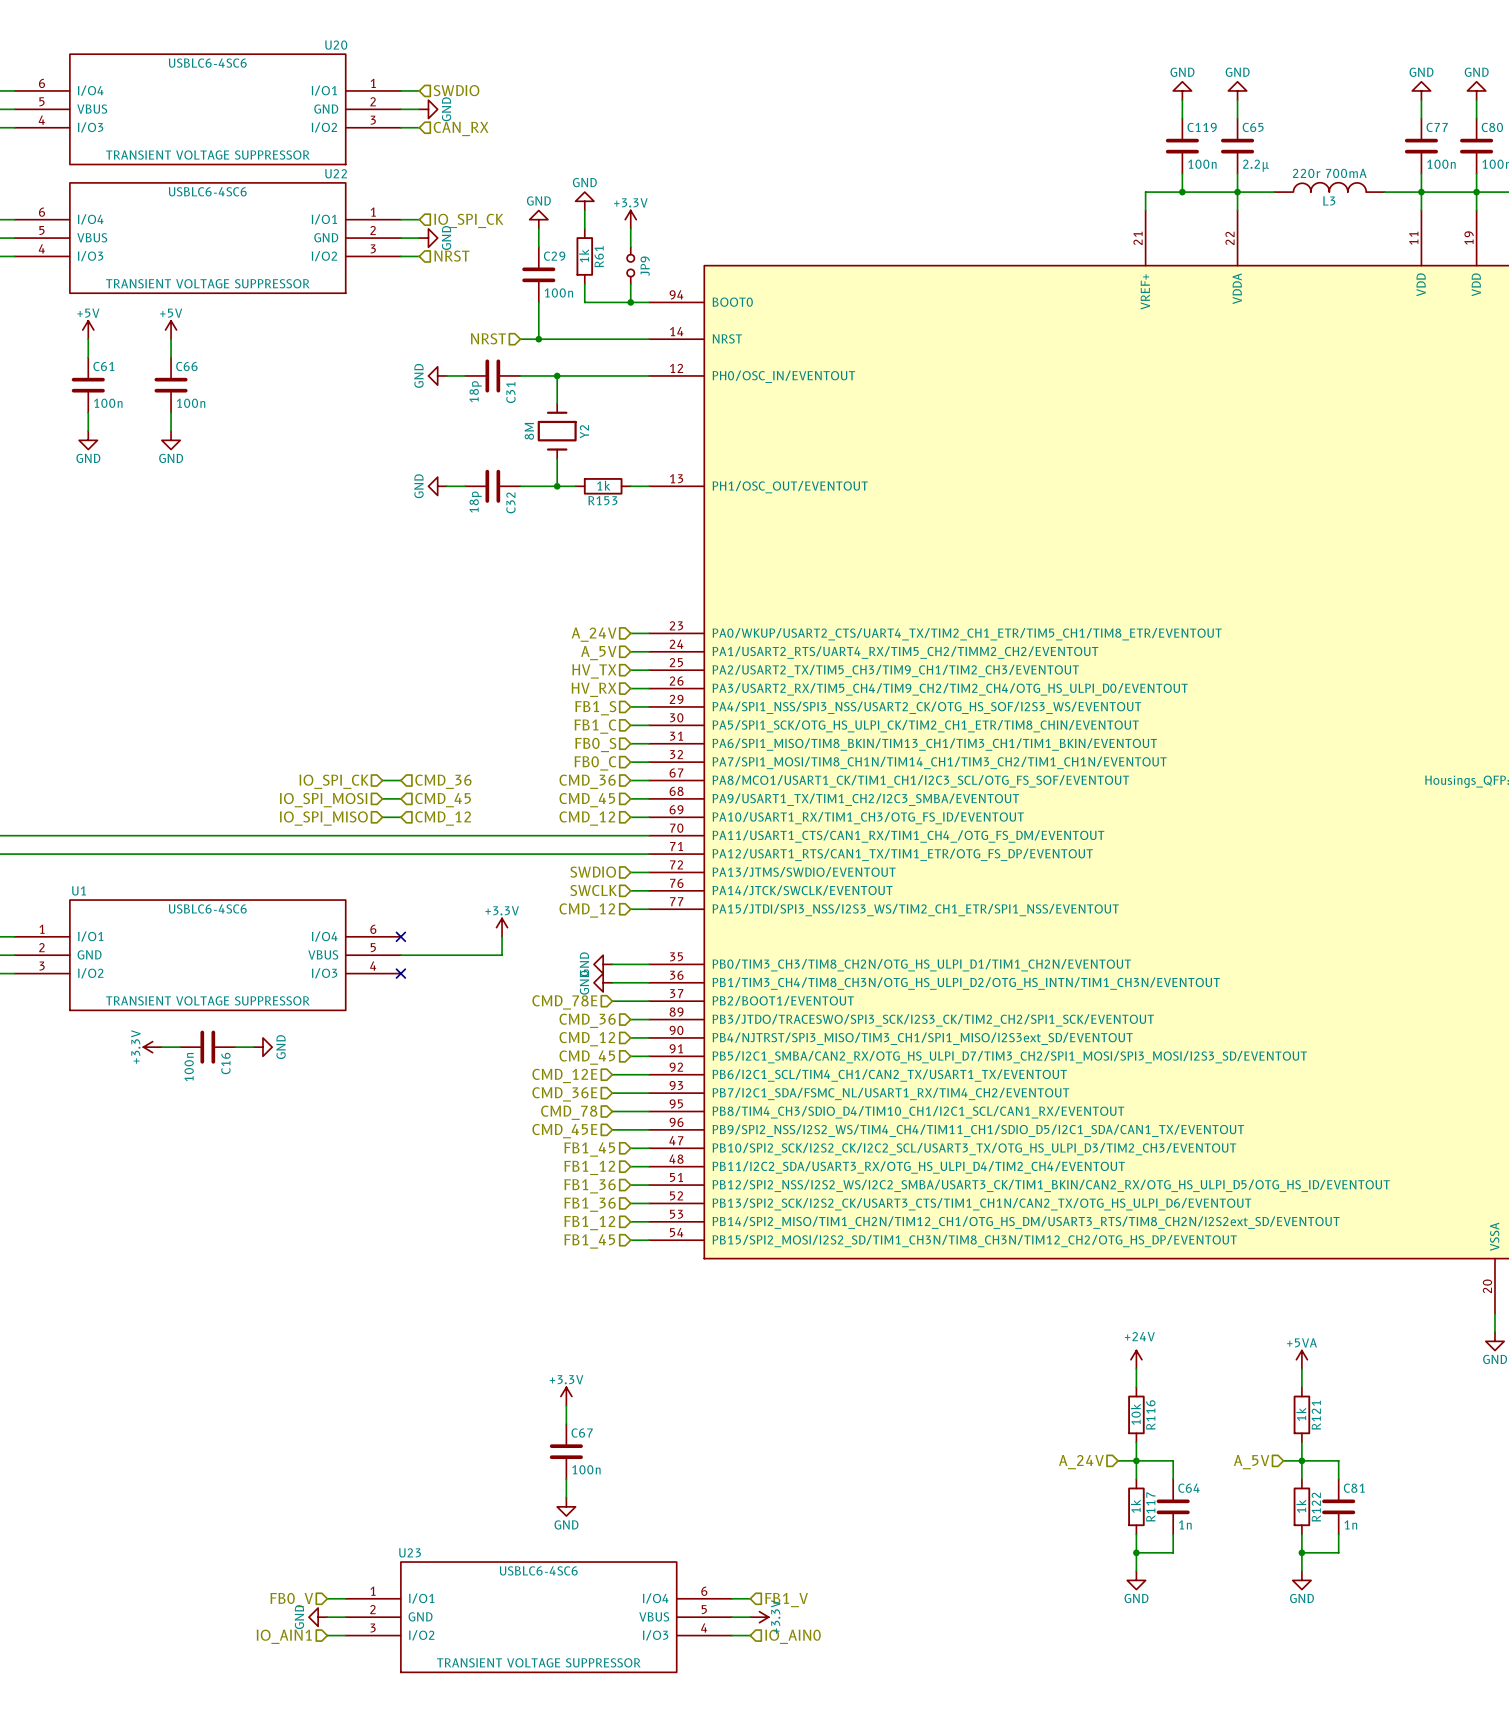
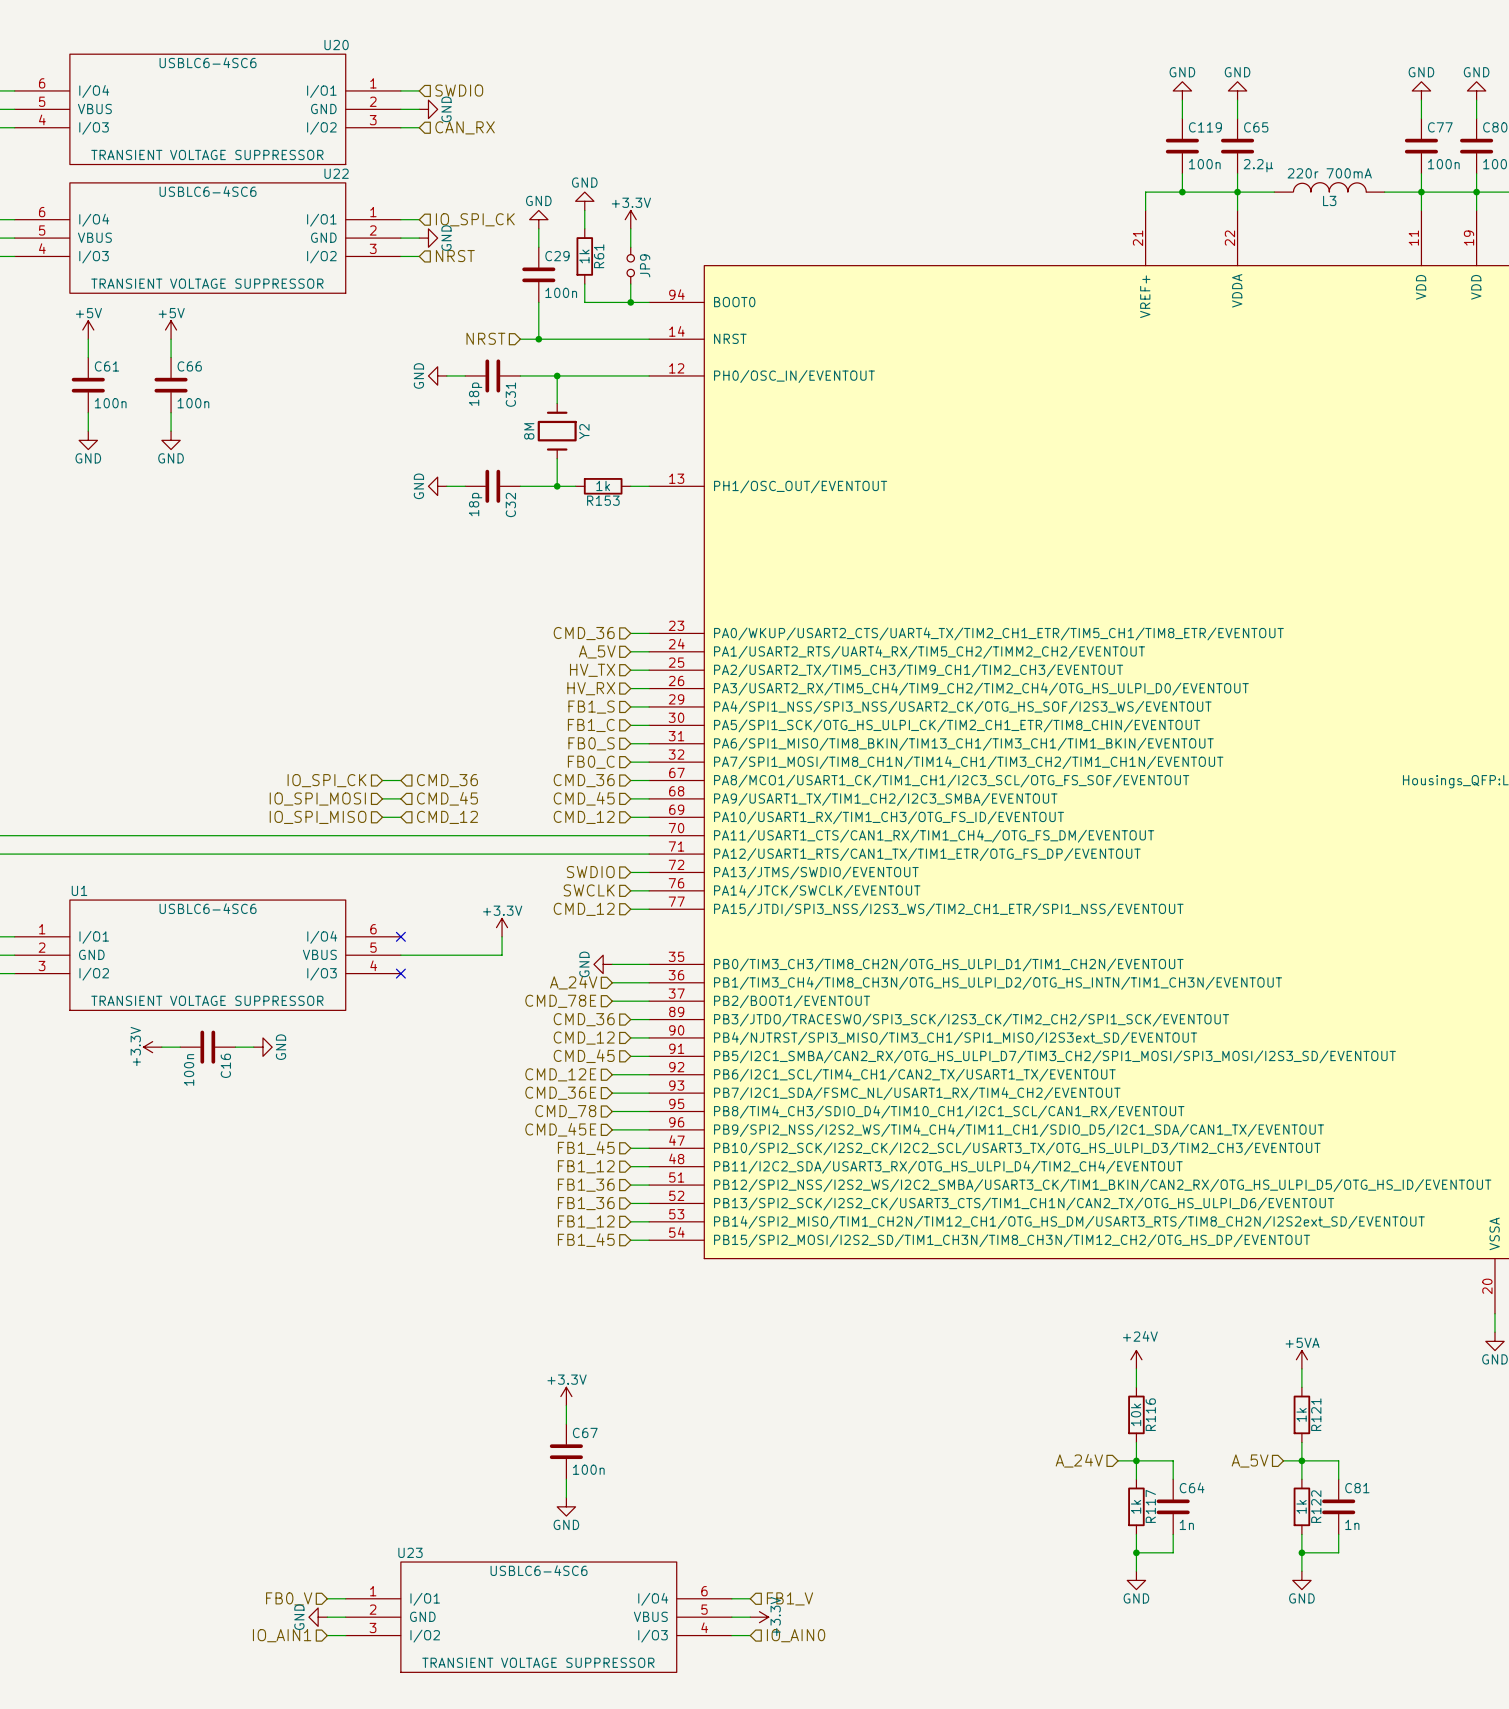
hierarchical label: A_24V (594, 634) -> CMD_36 (584, 633)
power symbol: GND (603, 982) -> none
hierarchical label: none -> A_24V (573, 982)

